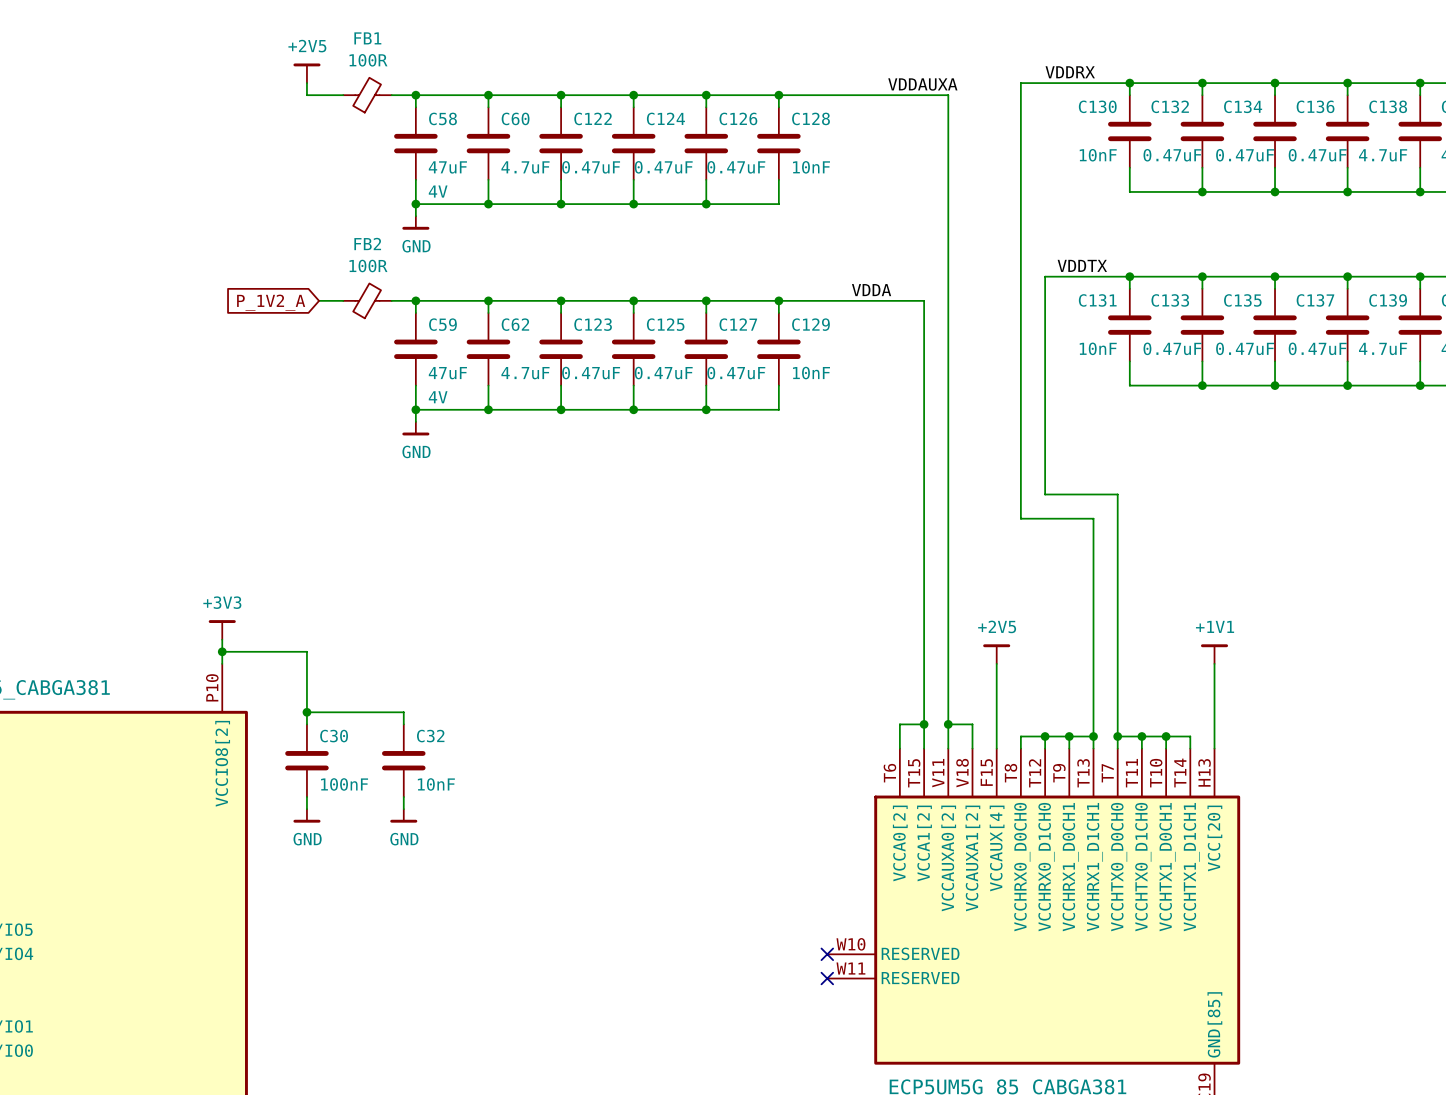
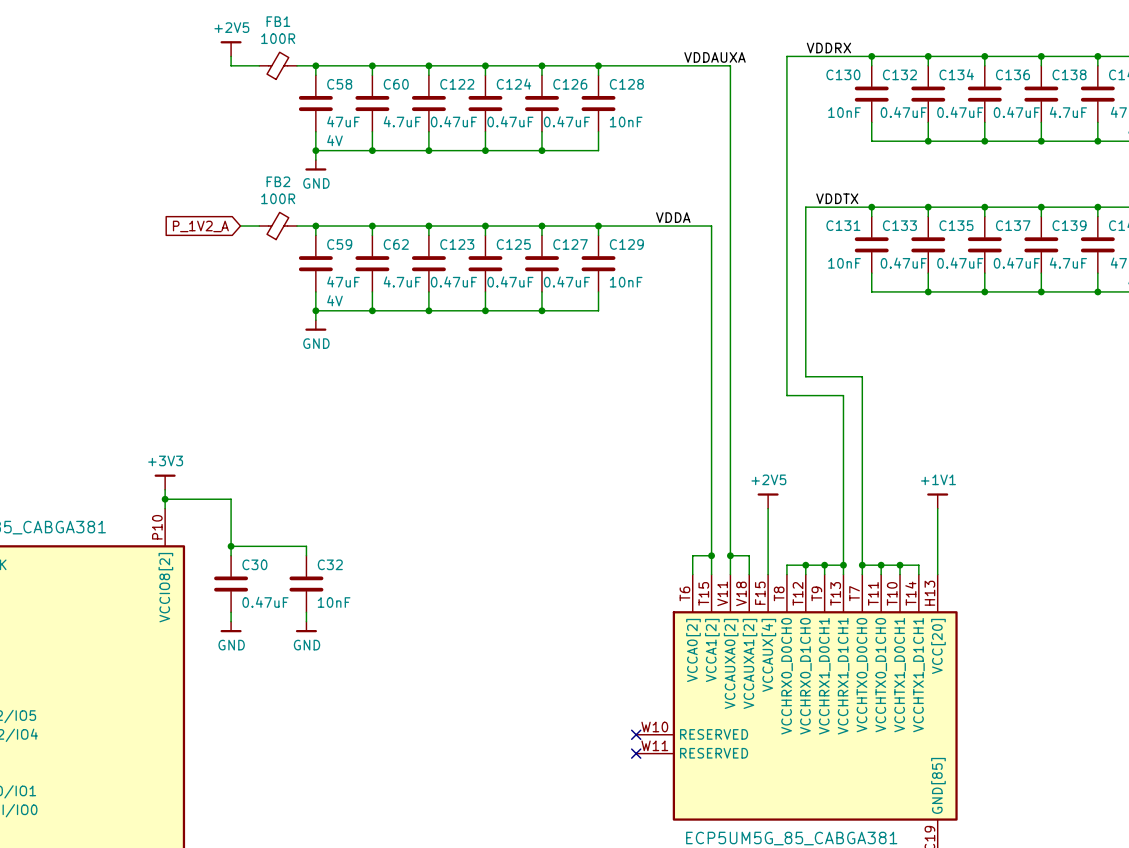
C30 value: 100nF (344, 784) -> 0.47uF (265, 602)

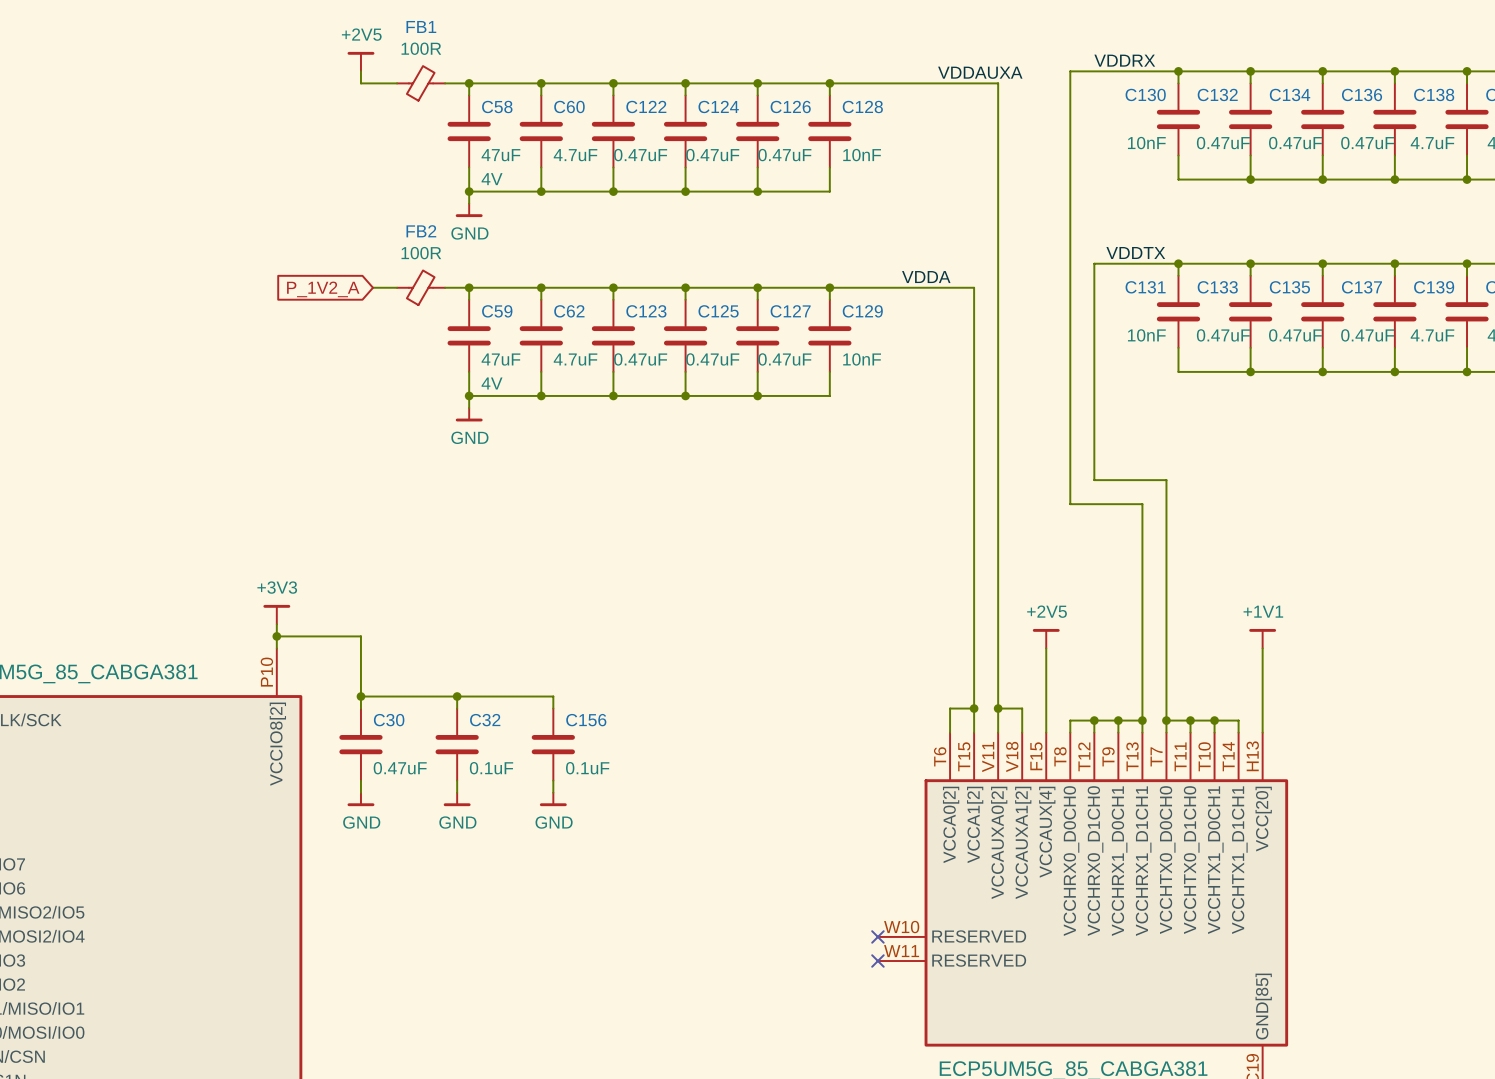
wire: none -> (457, 696) (553, 696) (553, 708)
junction: none -> (457, 696)
C156: none -> 0.1uF (553, 744)
C32 value: 10nF (334, 602) -> 0.1uF (491, 768)
wire: none -> (553, 780) (553, 792)
power symbol: none -> GND (553, 799)

